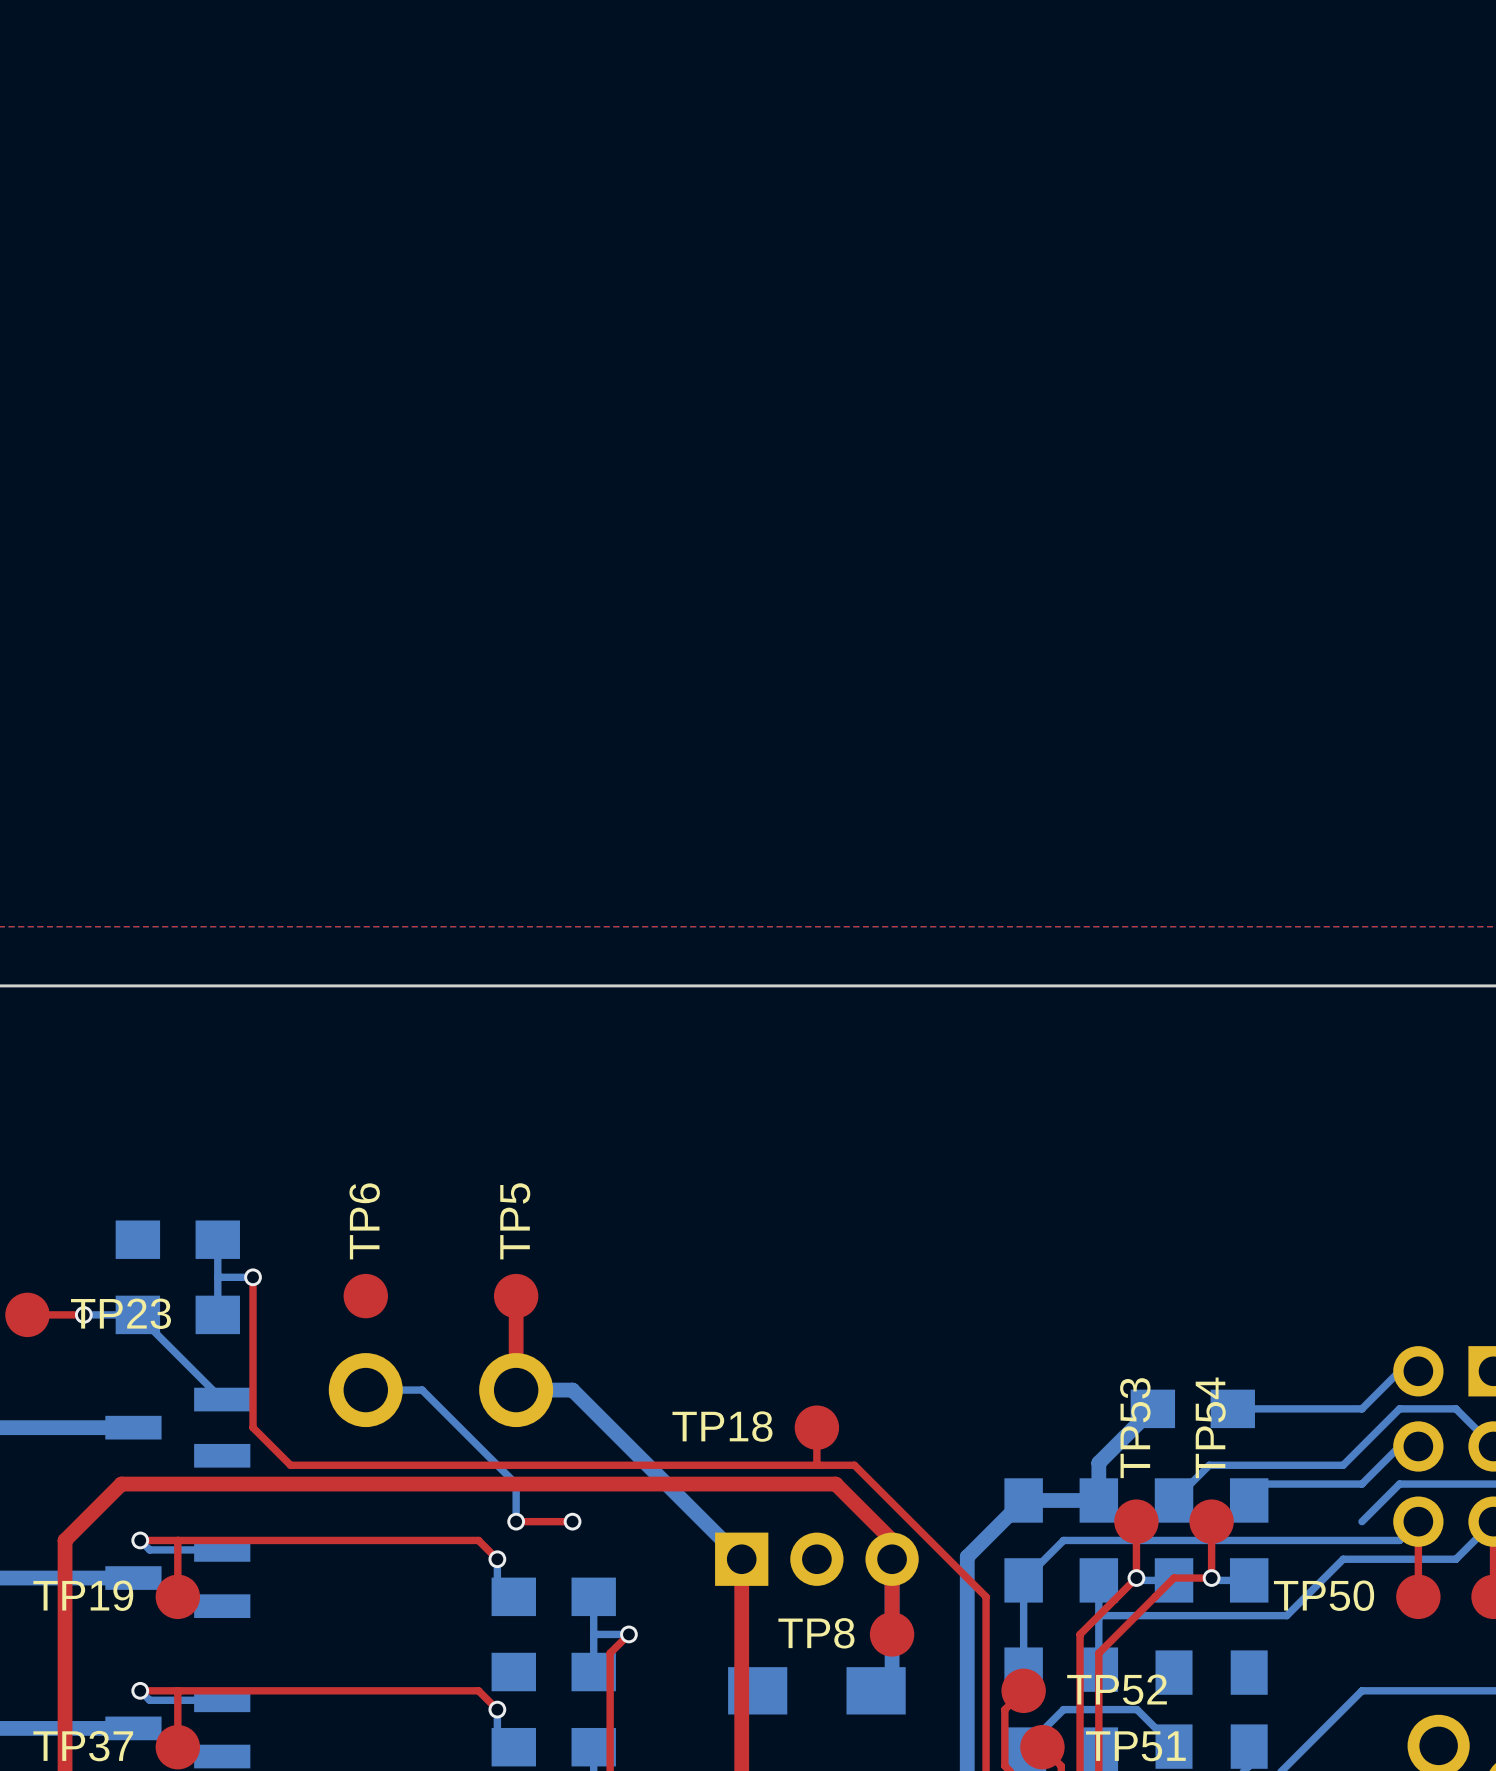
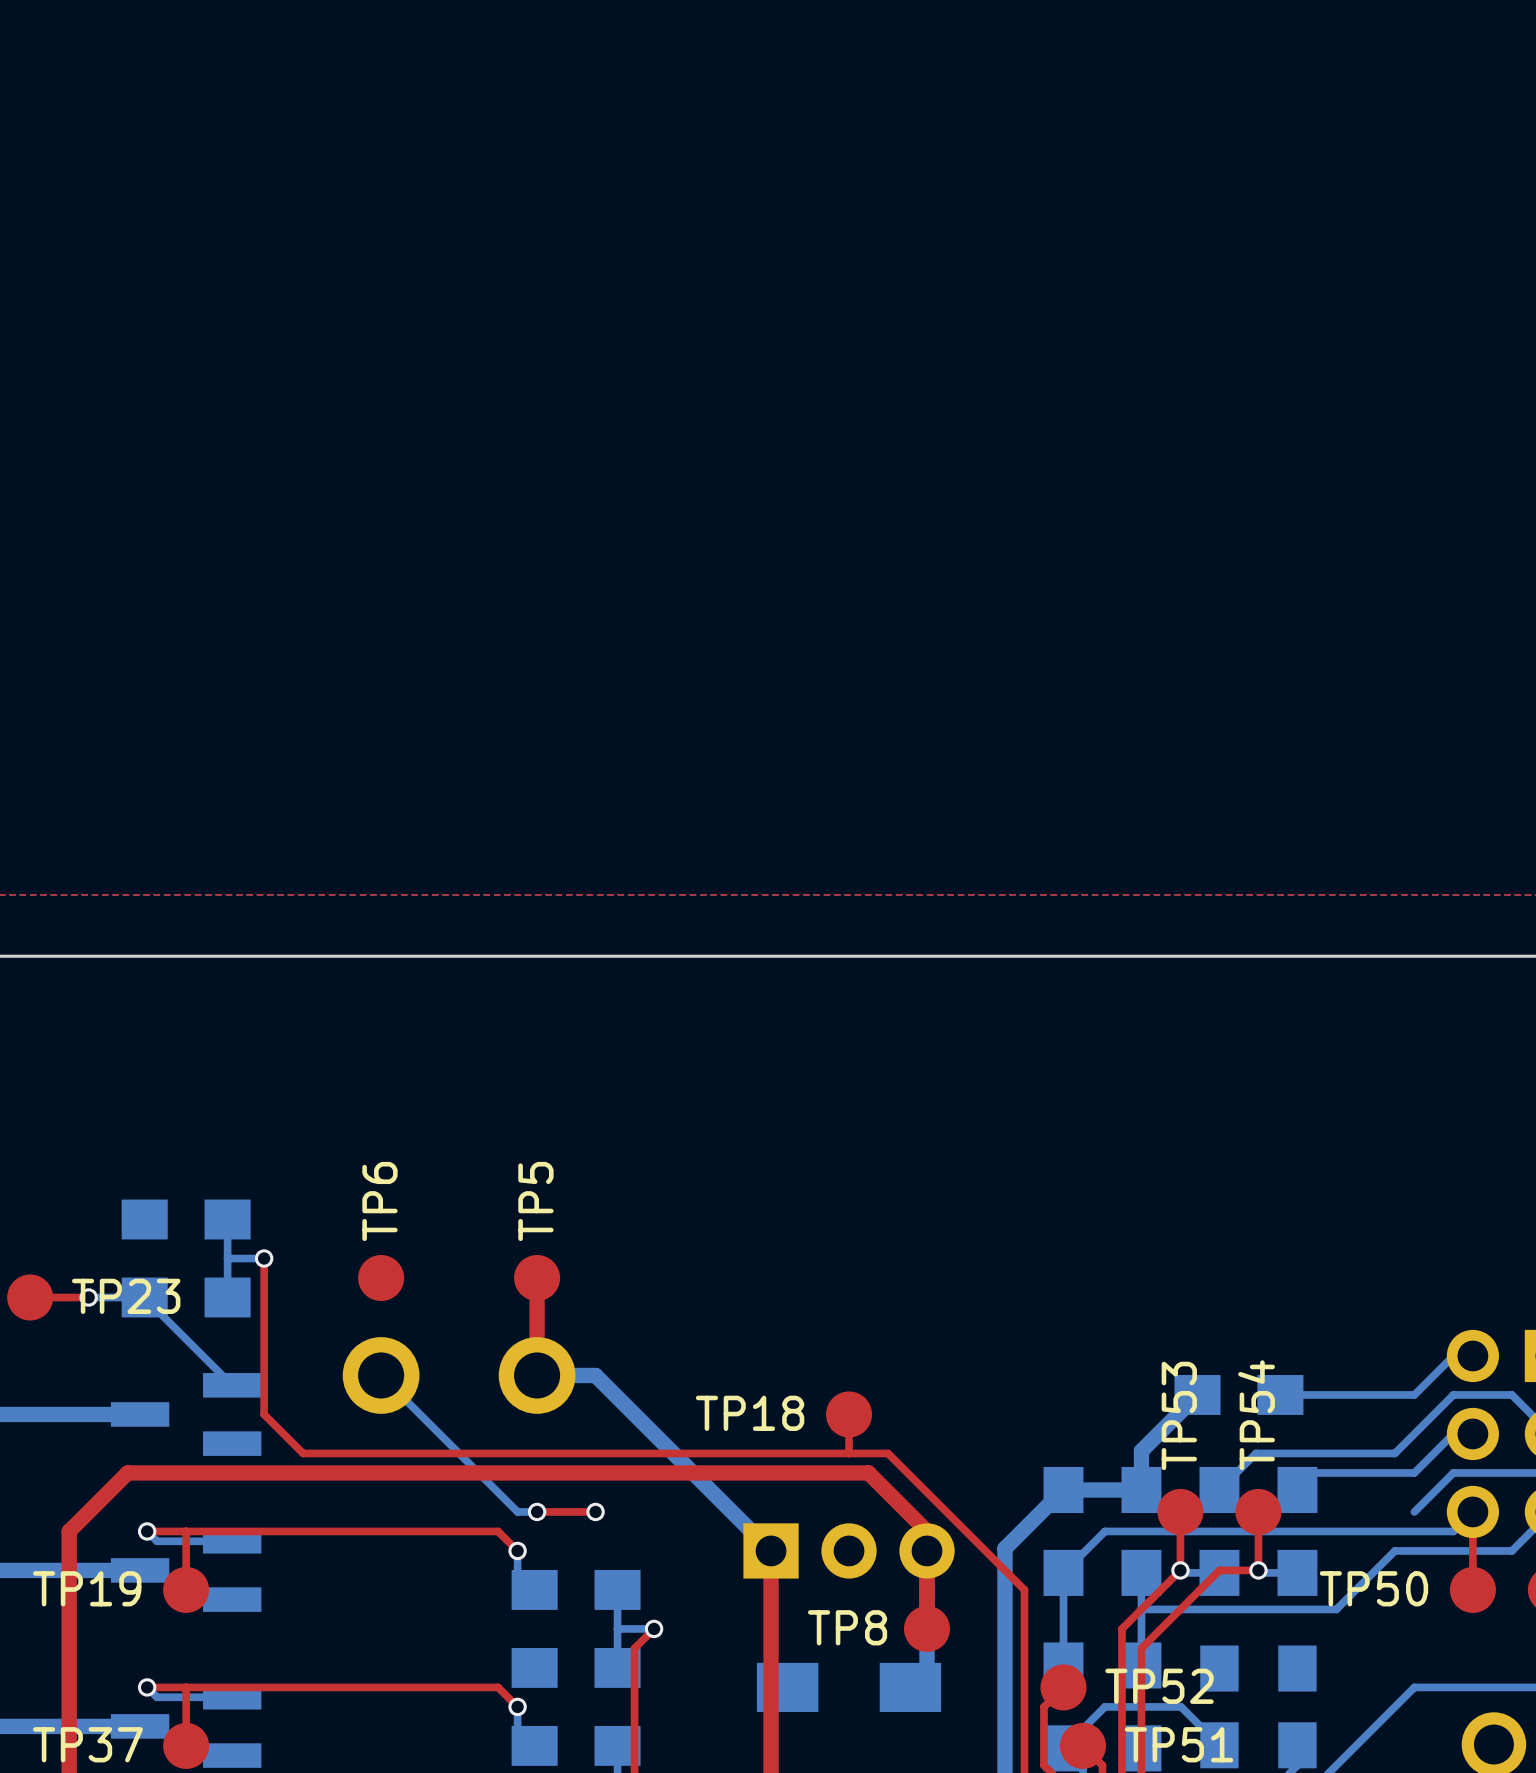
bottom track: (365, 1390) (422, 1390) (516, 1484) (516, 1521) -> (381, 1375) (517, 1511) (537, 1511)

